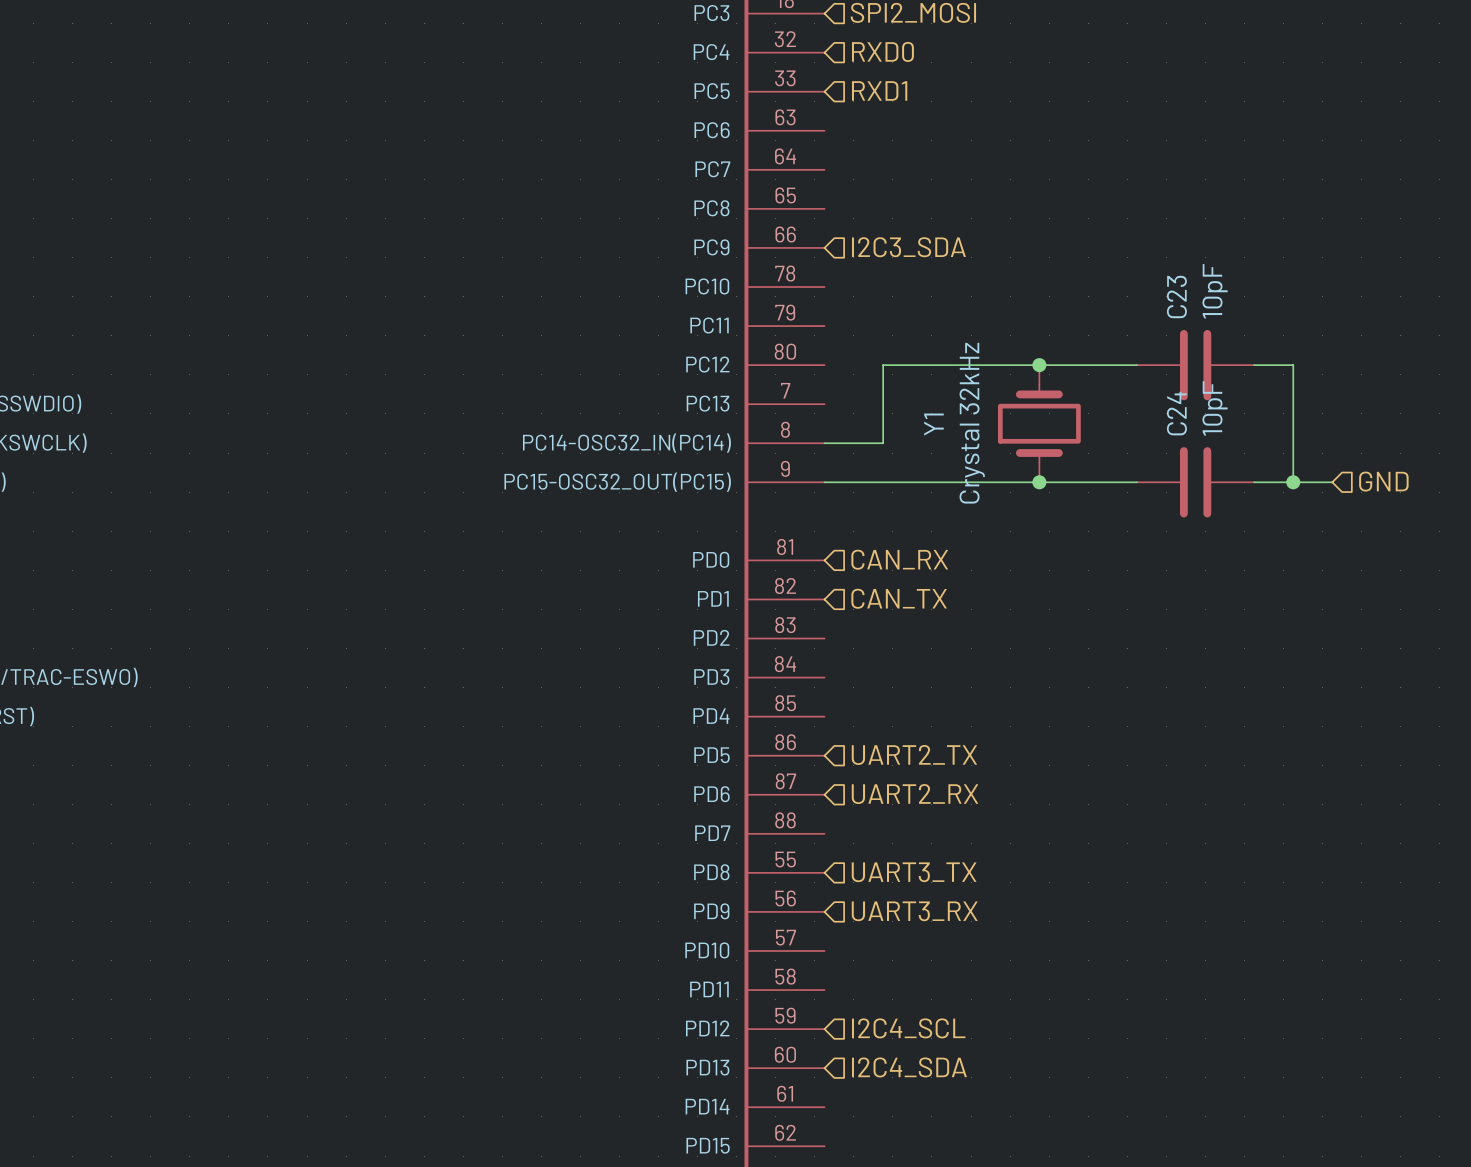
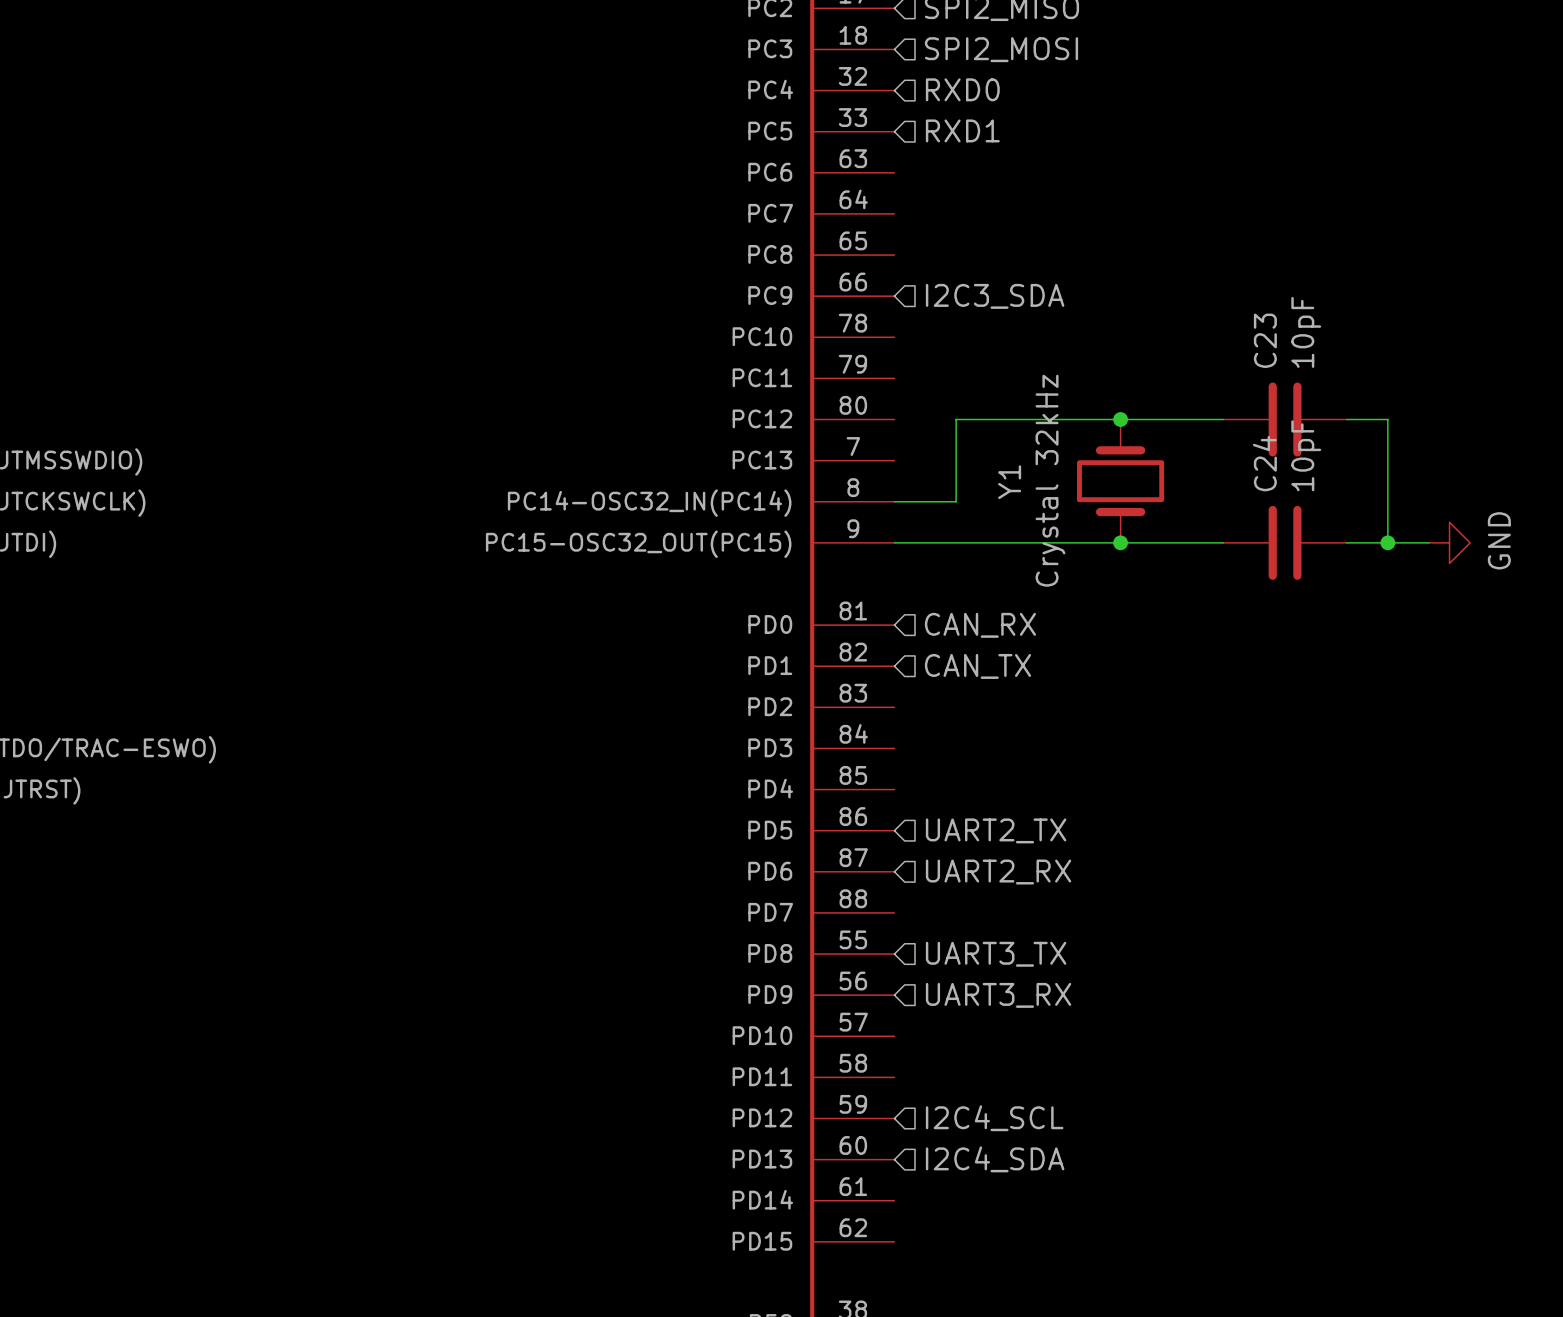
hierarchical label: GND (1383, 481) -> none
power symbol: none -> GND (1449, 542)

